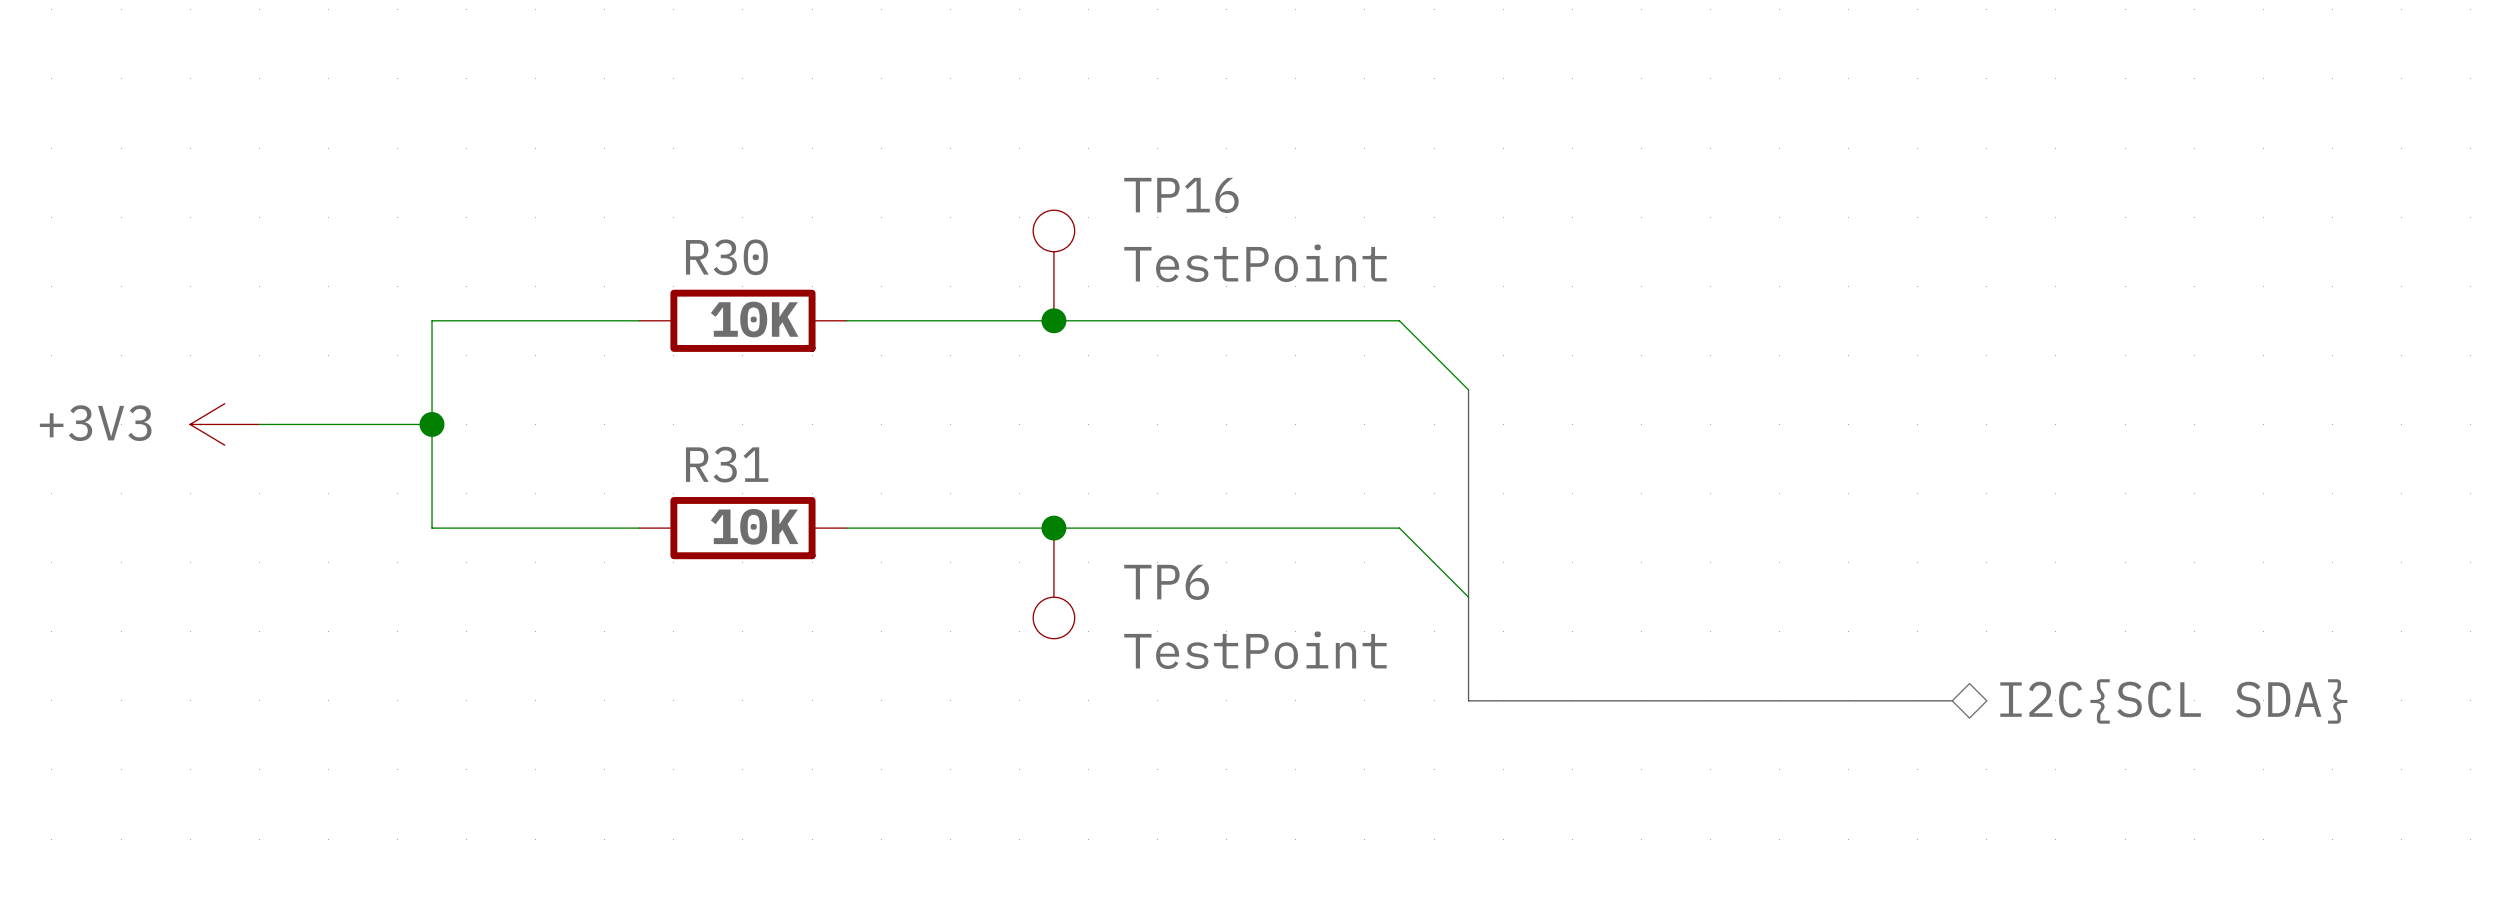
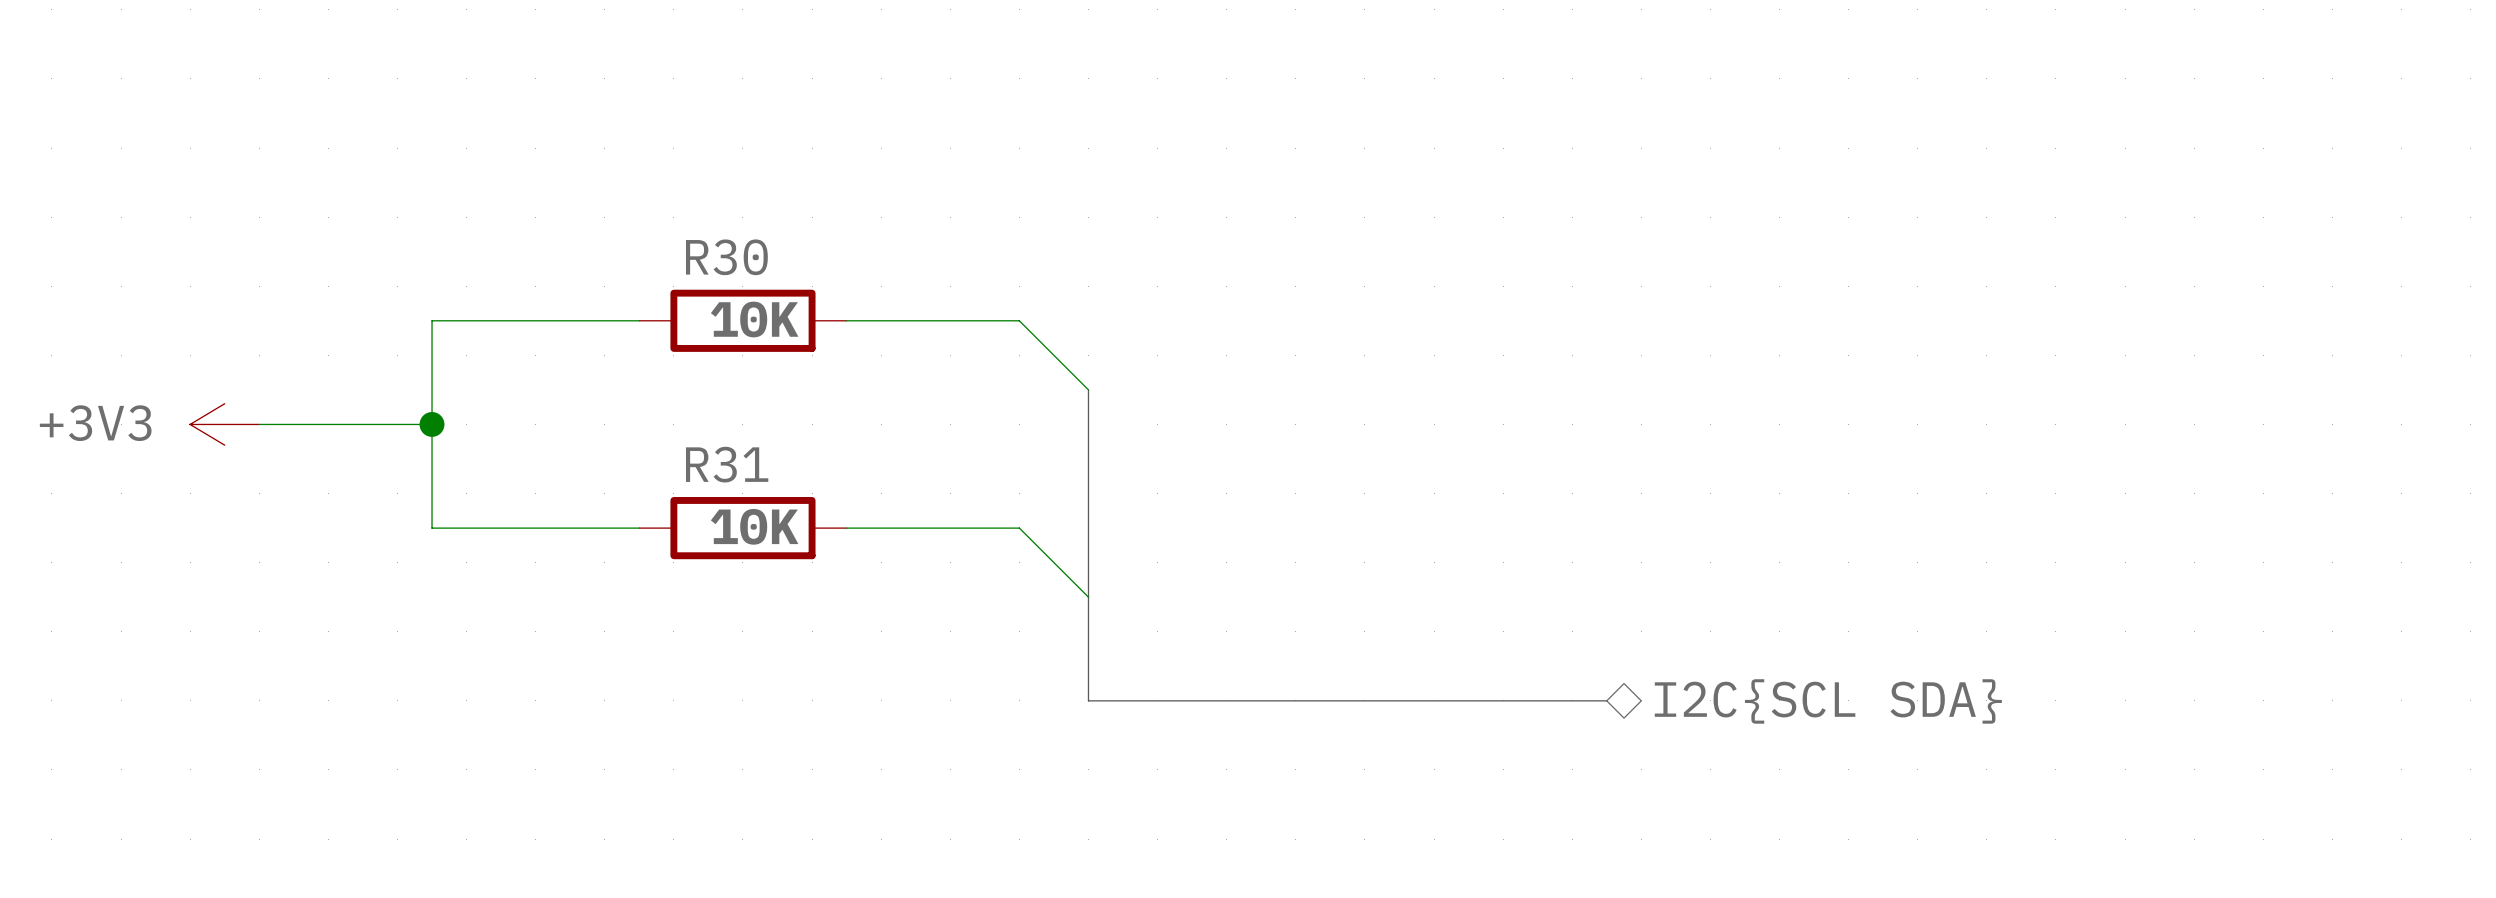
TP16: TestPoint (1053, 265) -> none
wire: (1019, 320) (1399, 320) (1468, 389) -> (1019, 320) (1088, 389)
junction: (1053, 320) -> none
bus: (1468, 389) (1468, 700) -> (1088, 389) (1088, 700) (1468, 700)
wire: (1019, 528) (1399, 528) (1468, 597) -> (1019, 528) (1088, 597)
junction: (1053, 528) -> none
TP6: TestPoint (1053, 583) -> none
bus: (1606, 700) (1952, 700) -> none
hierarchical label position: I2C{SCL SDA} (2173, 701) -> I2C{SCL SDA} (1828, 701)

